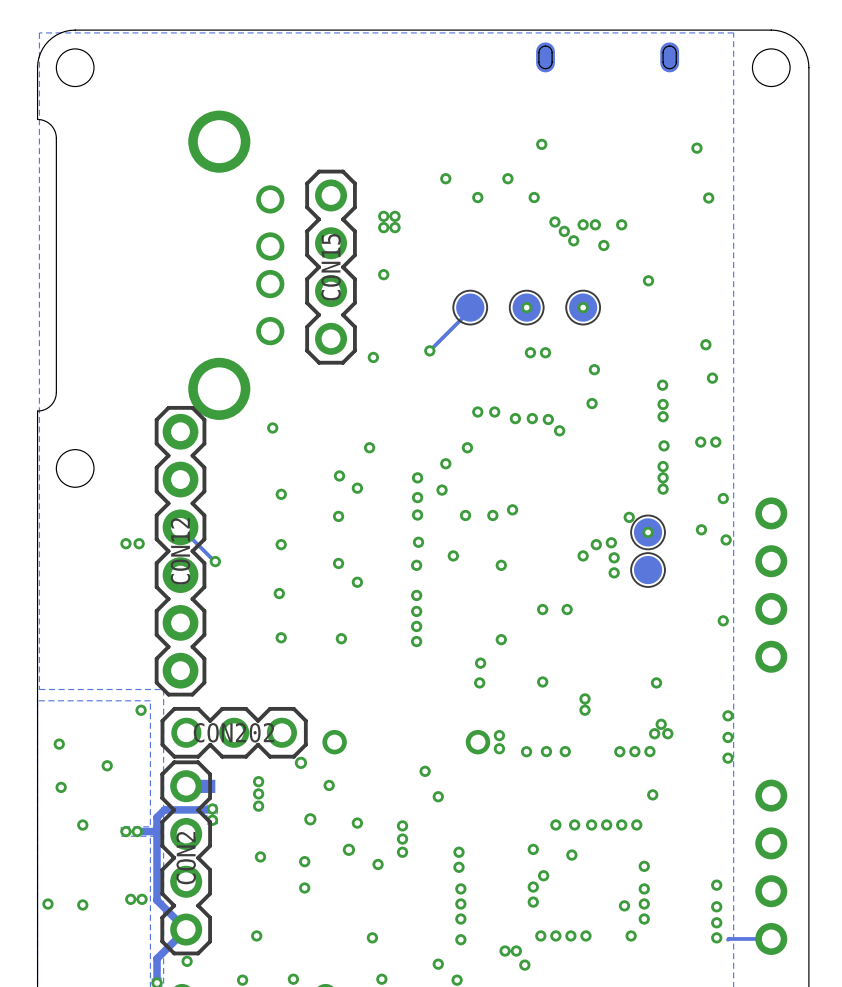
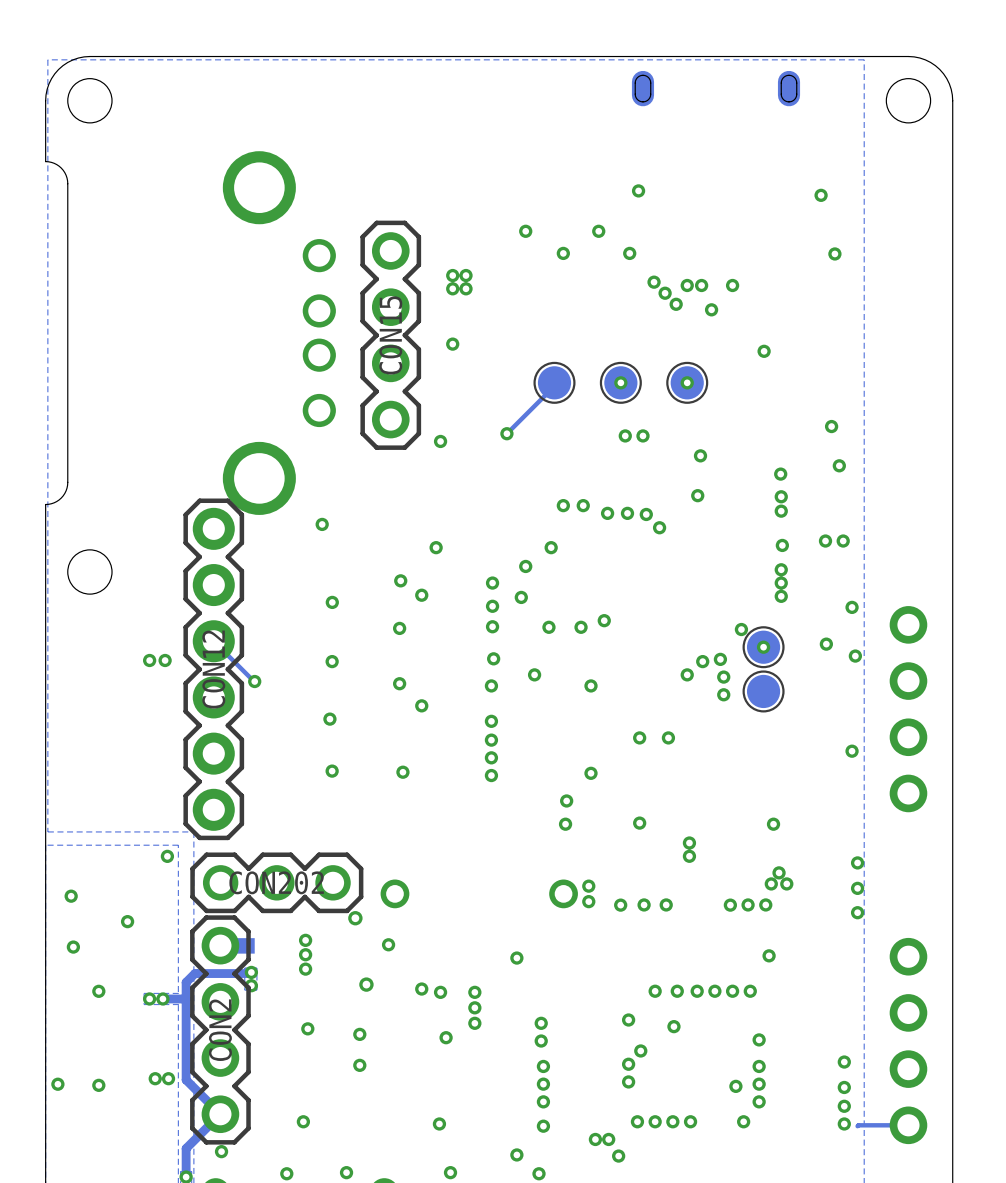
via position: (425, 771) -> (440, 992)
via: (348, 849) -> none

